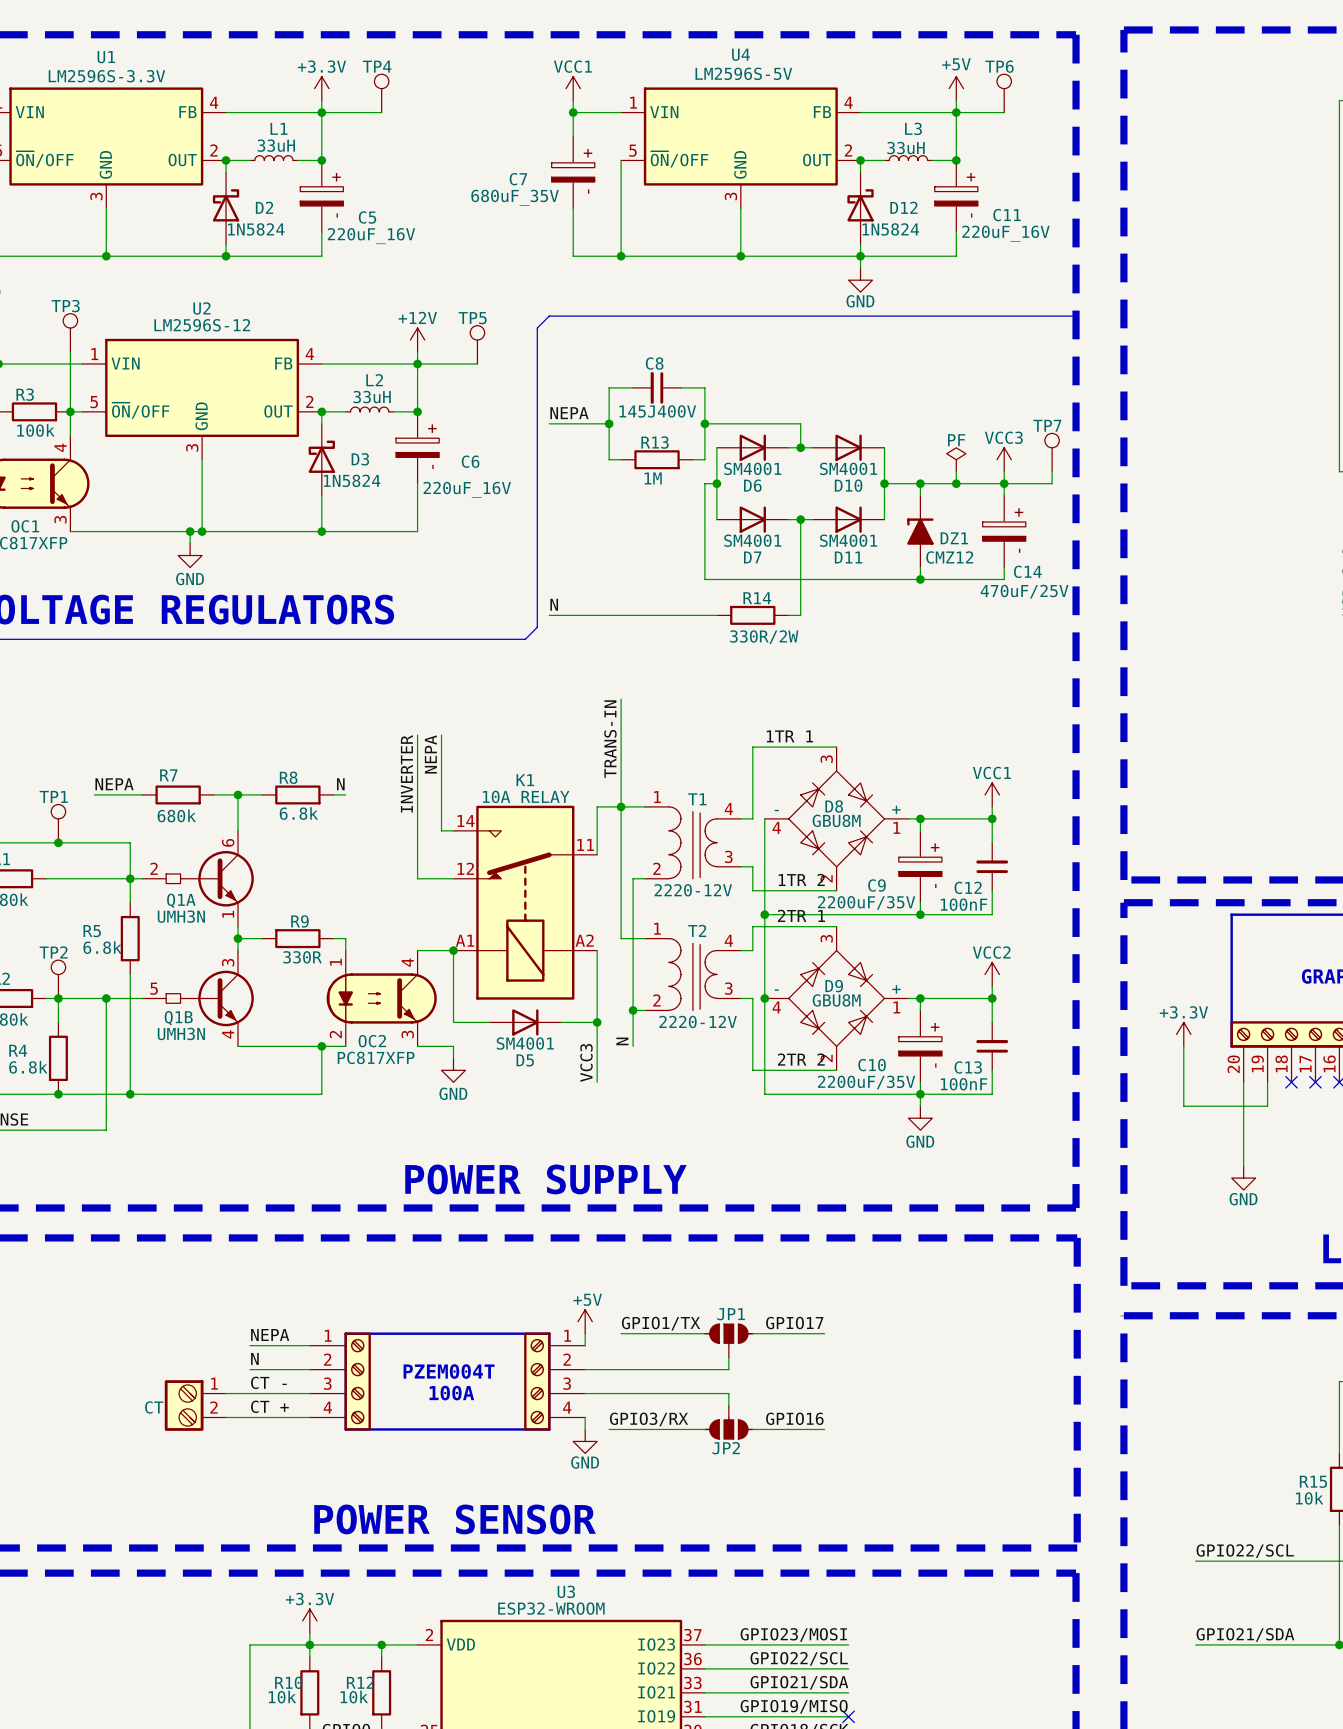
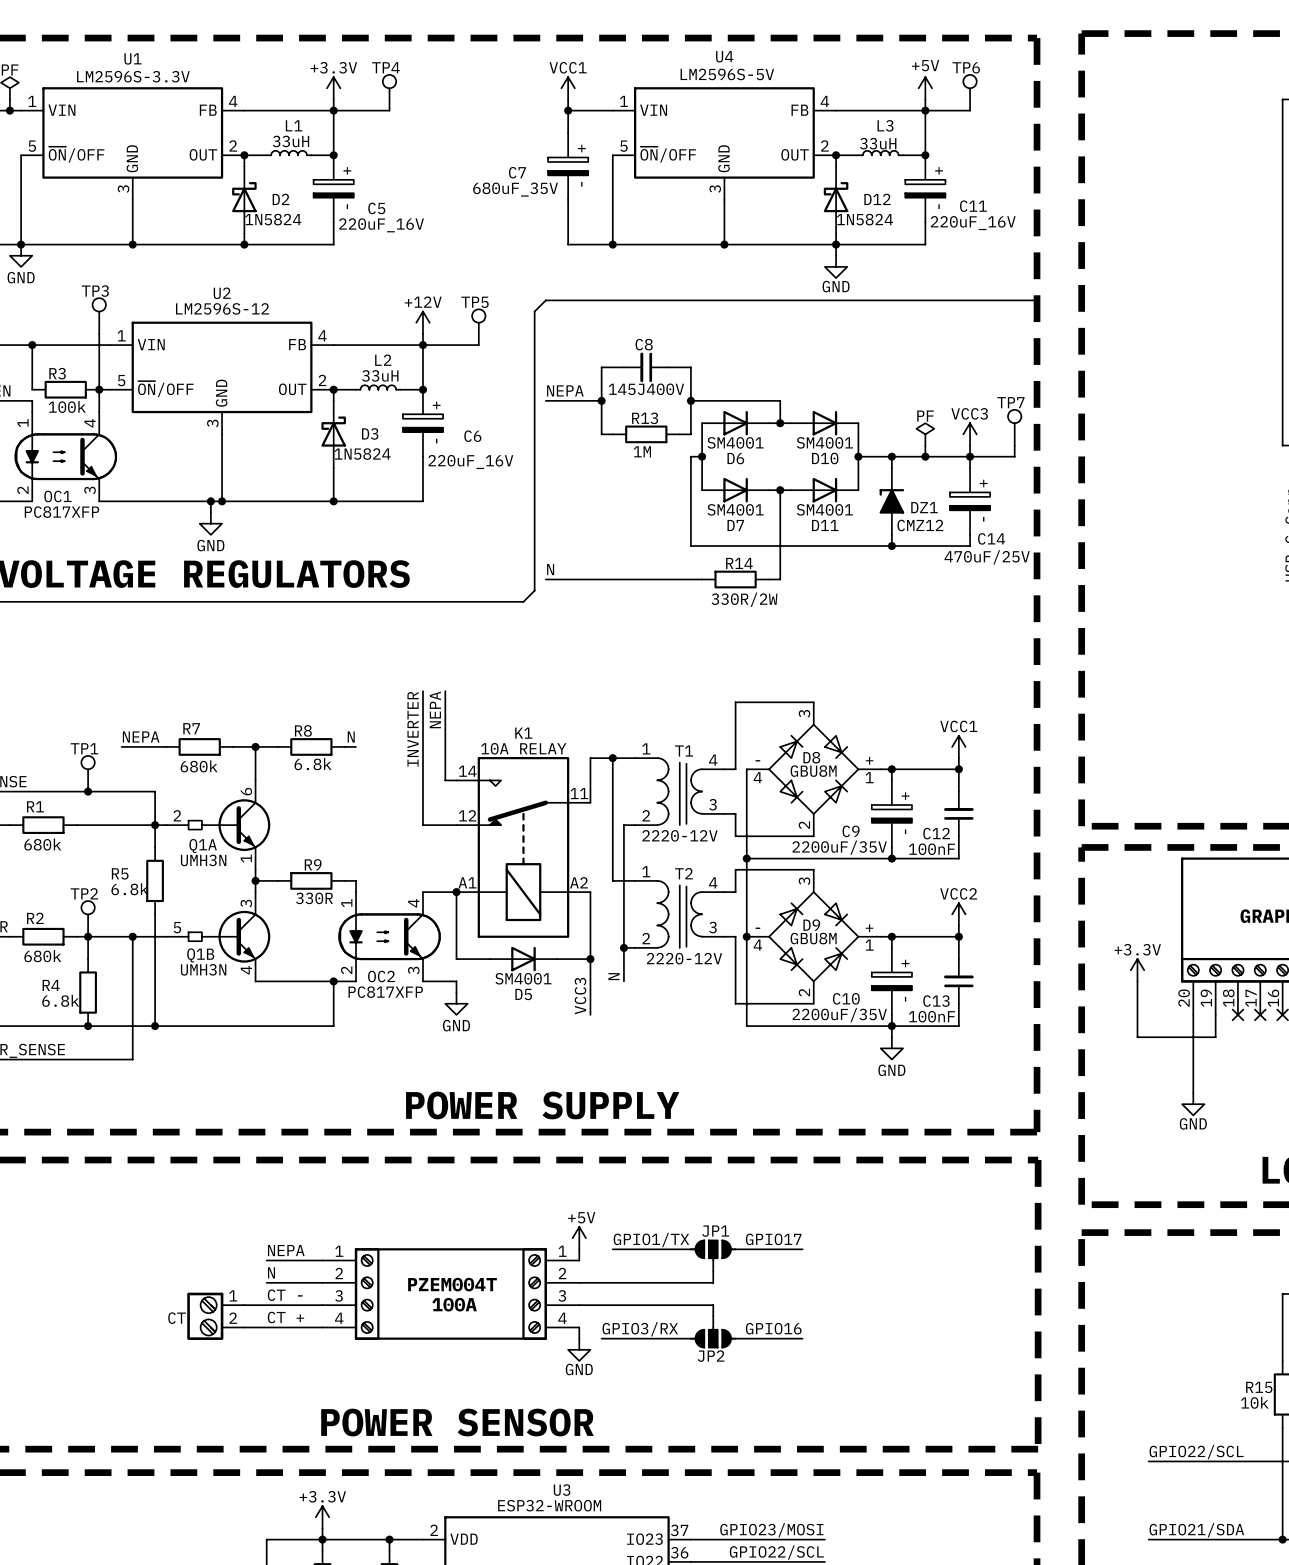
wire: (621, 699) (621, 806) -> none
label: 1TR 1 (789, 736) -> none
label: TRANS-IN (610, 739) -> none
label: 1TR 2 (801, 879) -> none
label: 2TR 1 (801, 915) -> none
label: 2TR 2 (801, 1059) -> none

